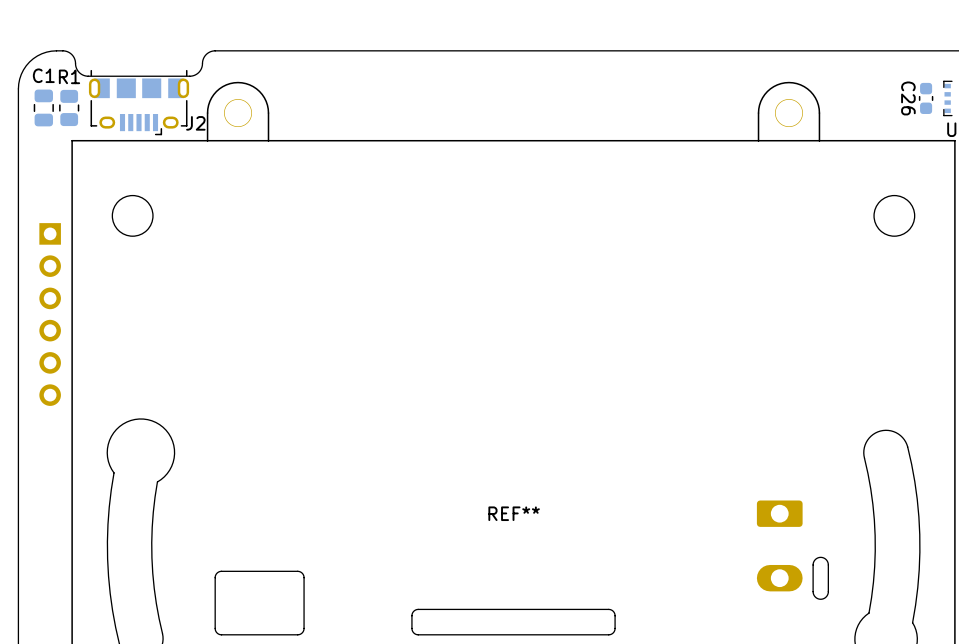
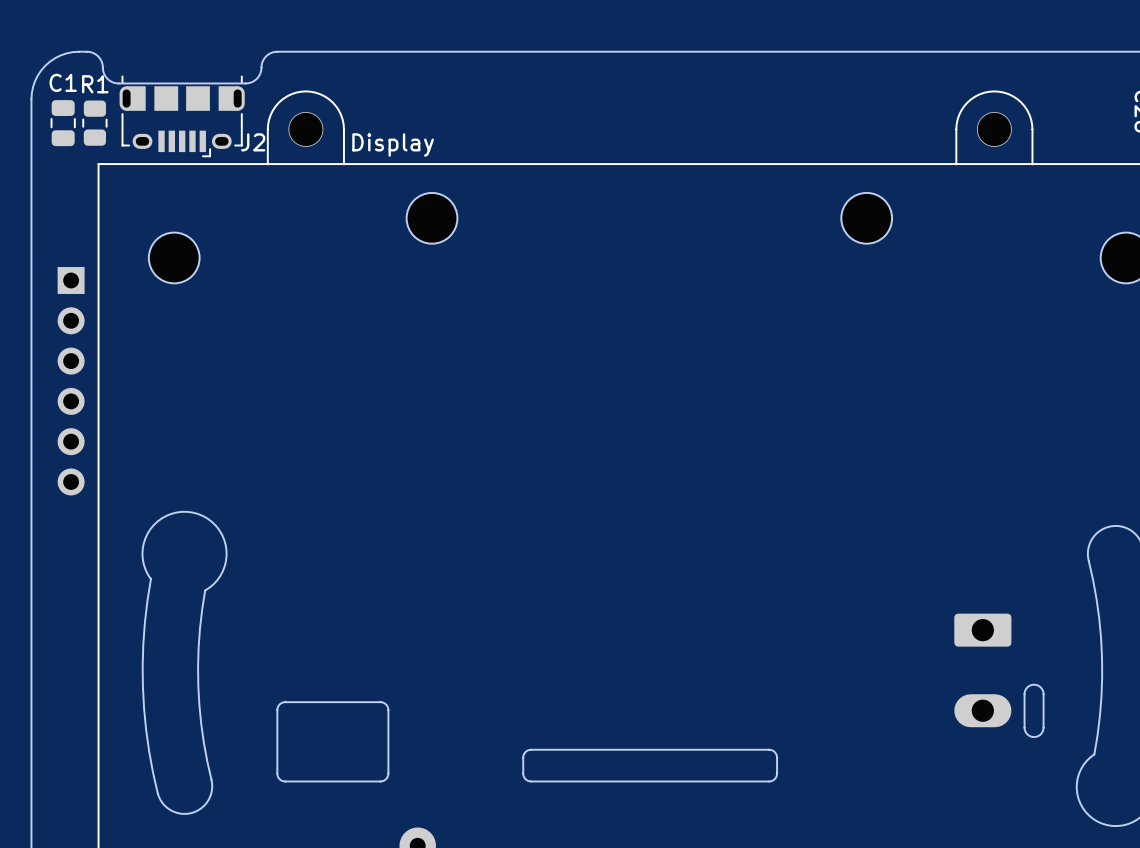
part: none -> (432, 218)
part: none -> (866, 218)
REF** name: REF** (514, 513) -> Display (393, 145)

